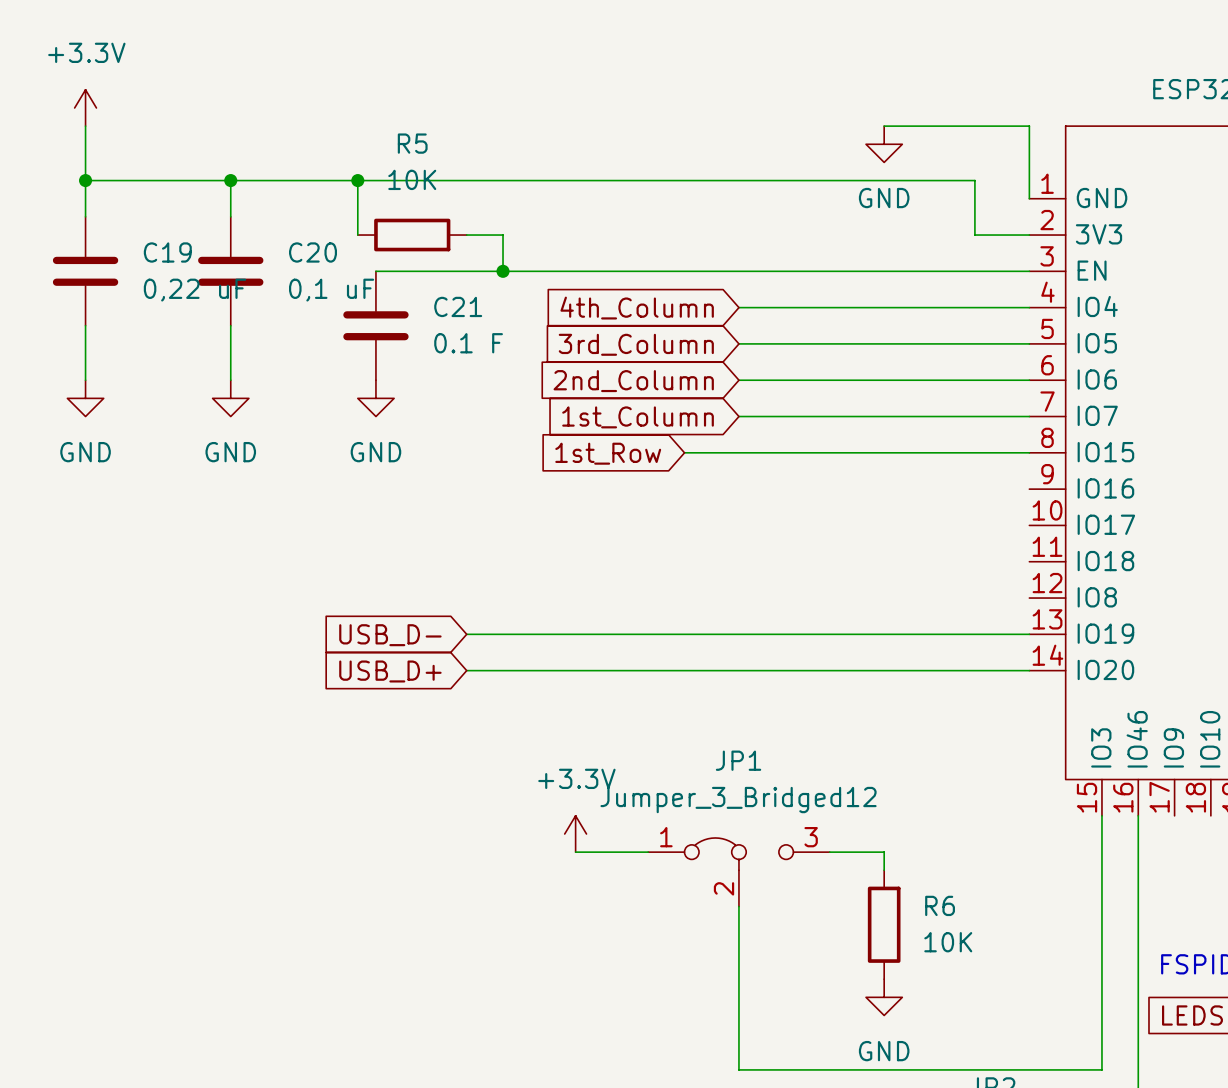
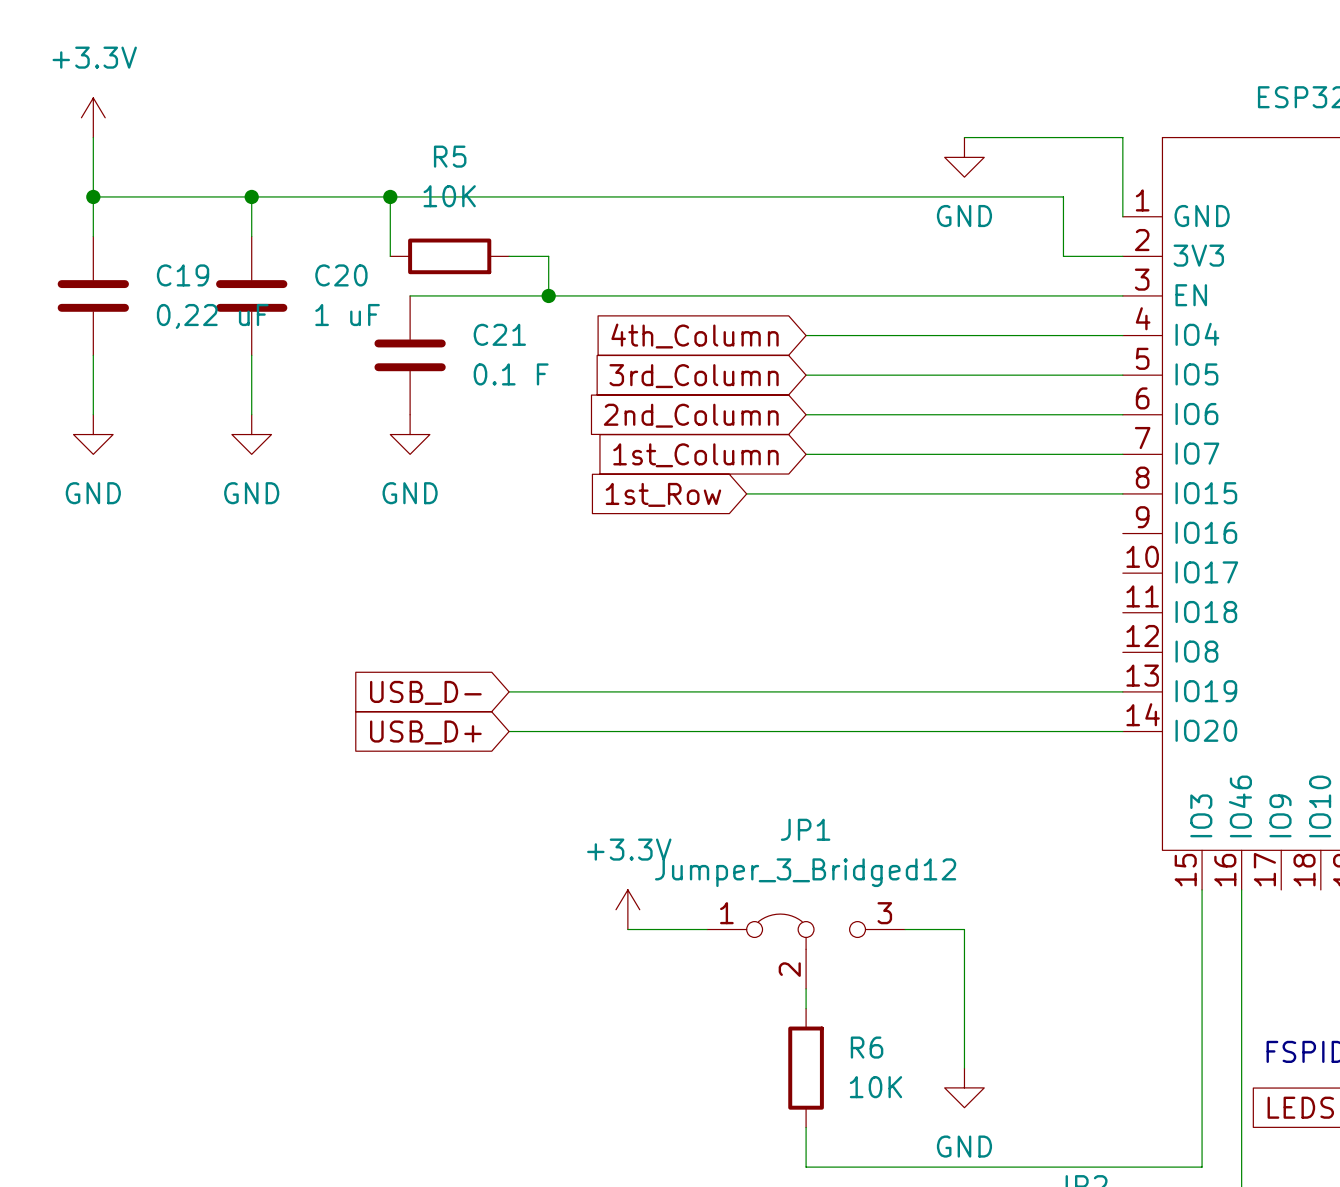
C20 value: 0,1 uF (331, 290) -> 1 uF (347, 315)
wire: (738, 924) (738, 1033) -> (964, 949) (964, 1068)
R6 position: (884, 924) -> (806, 1068)

